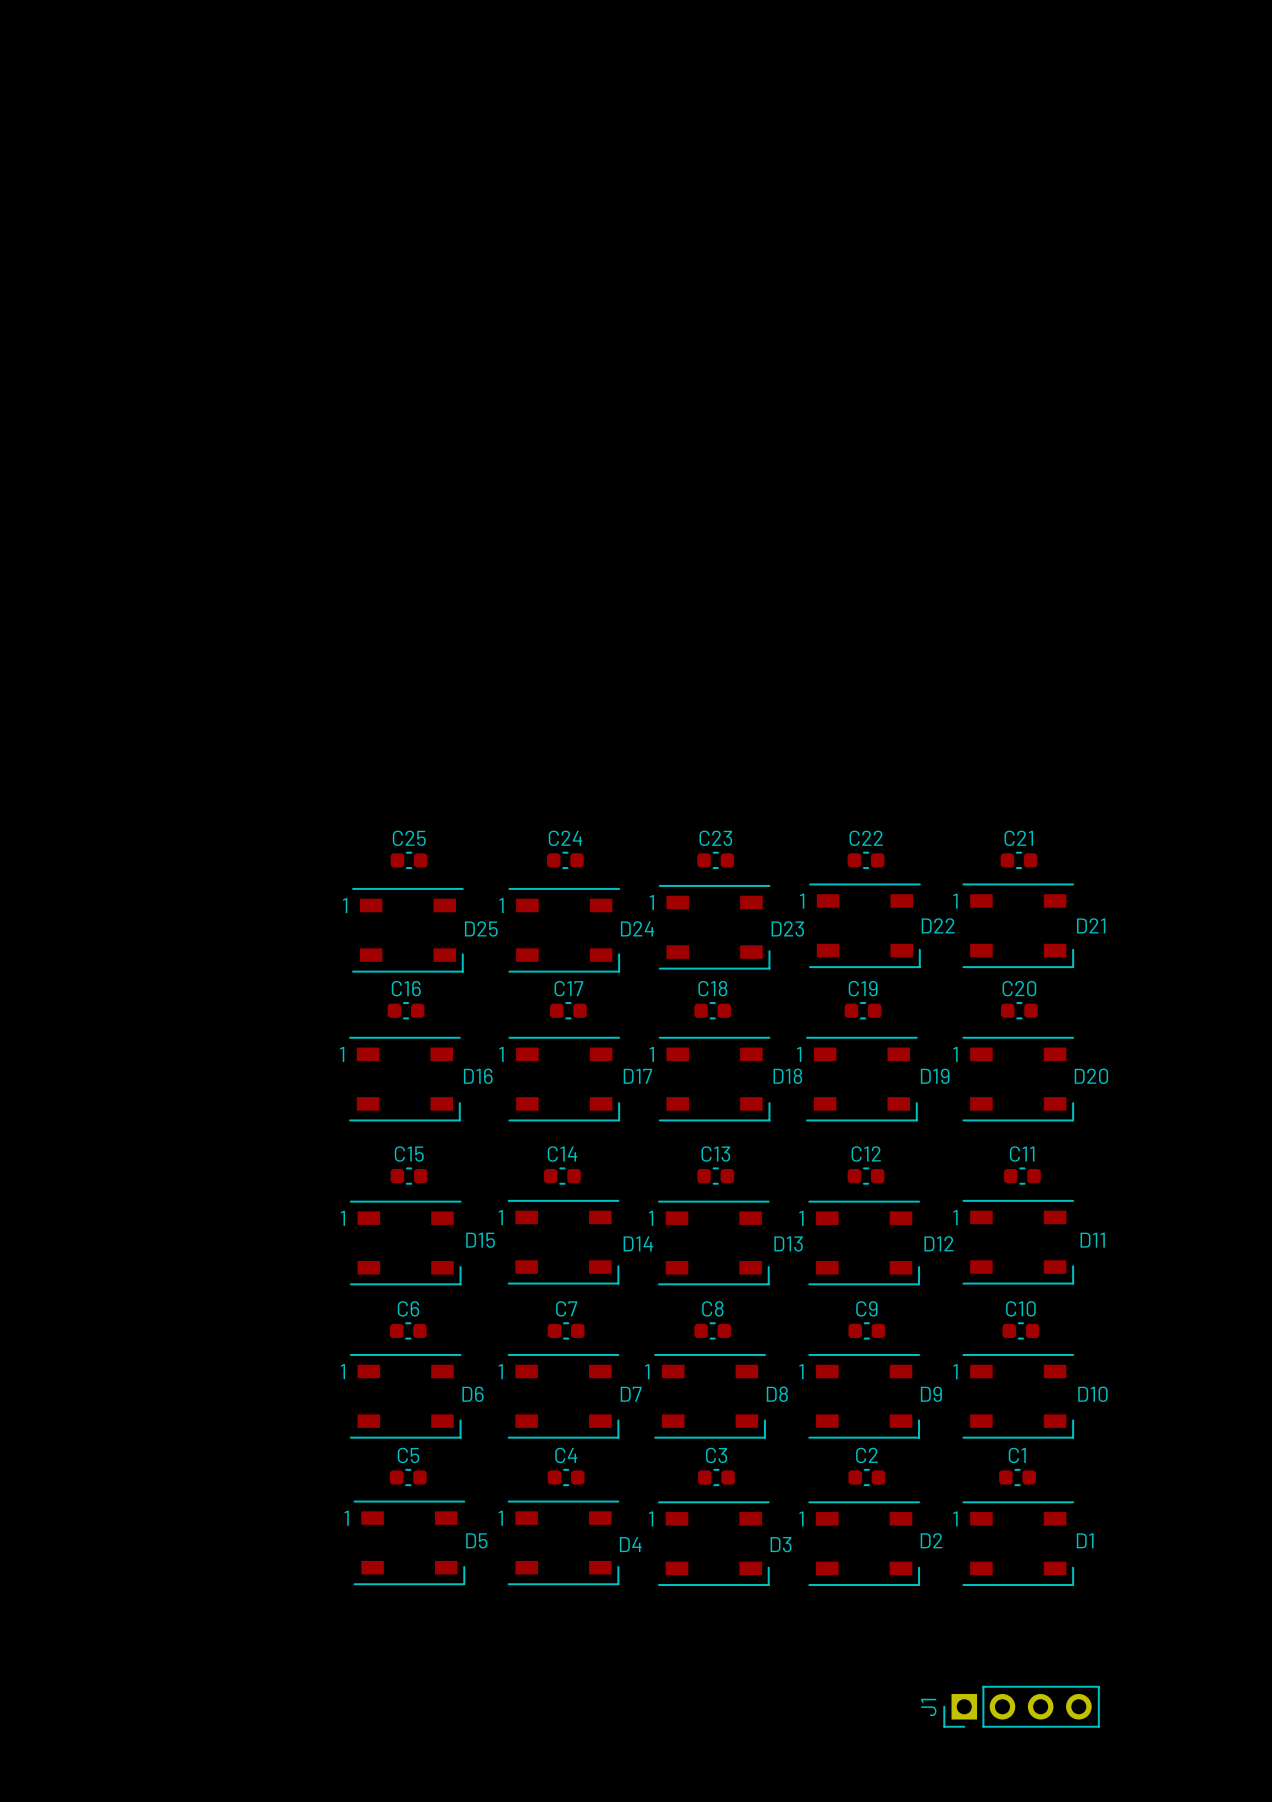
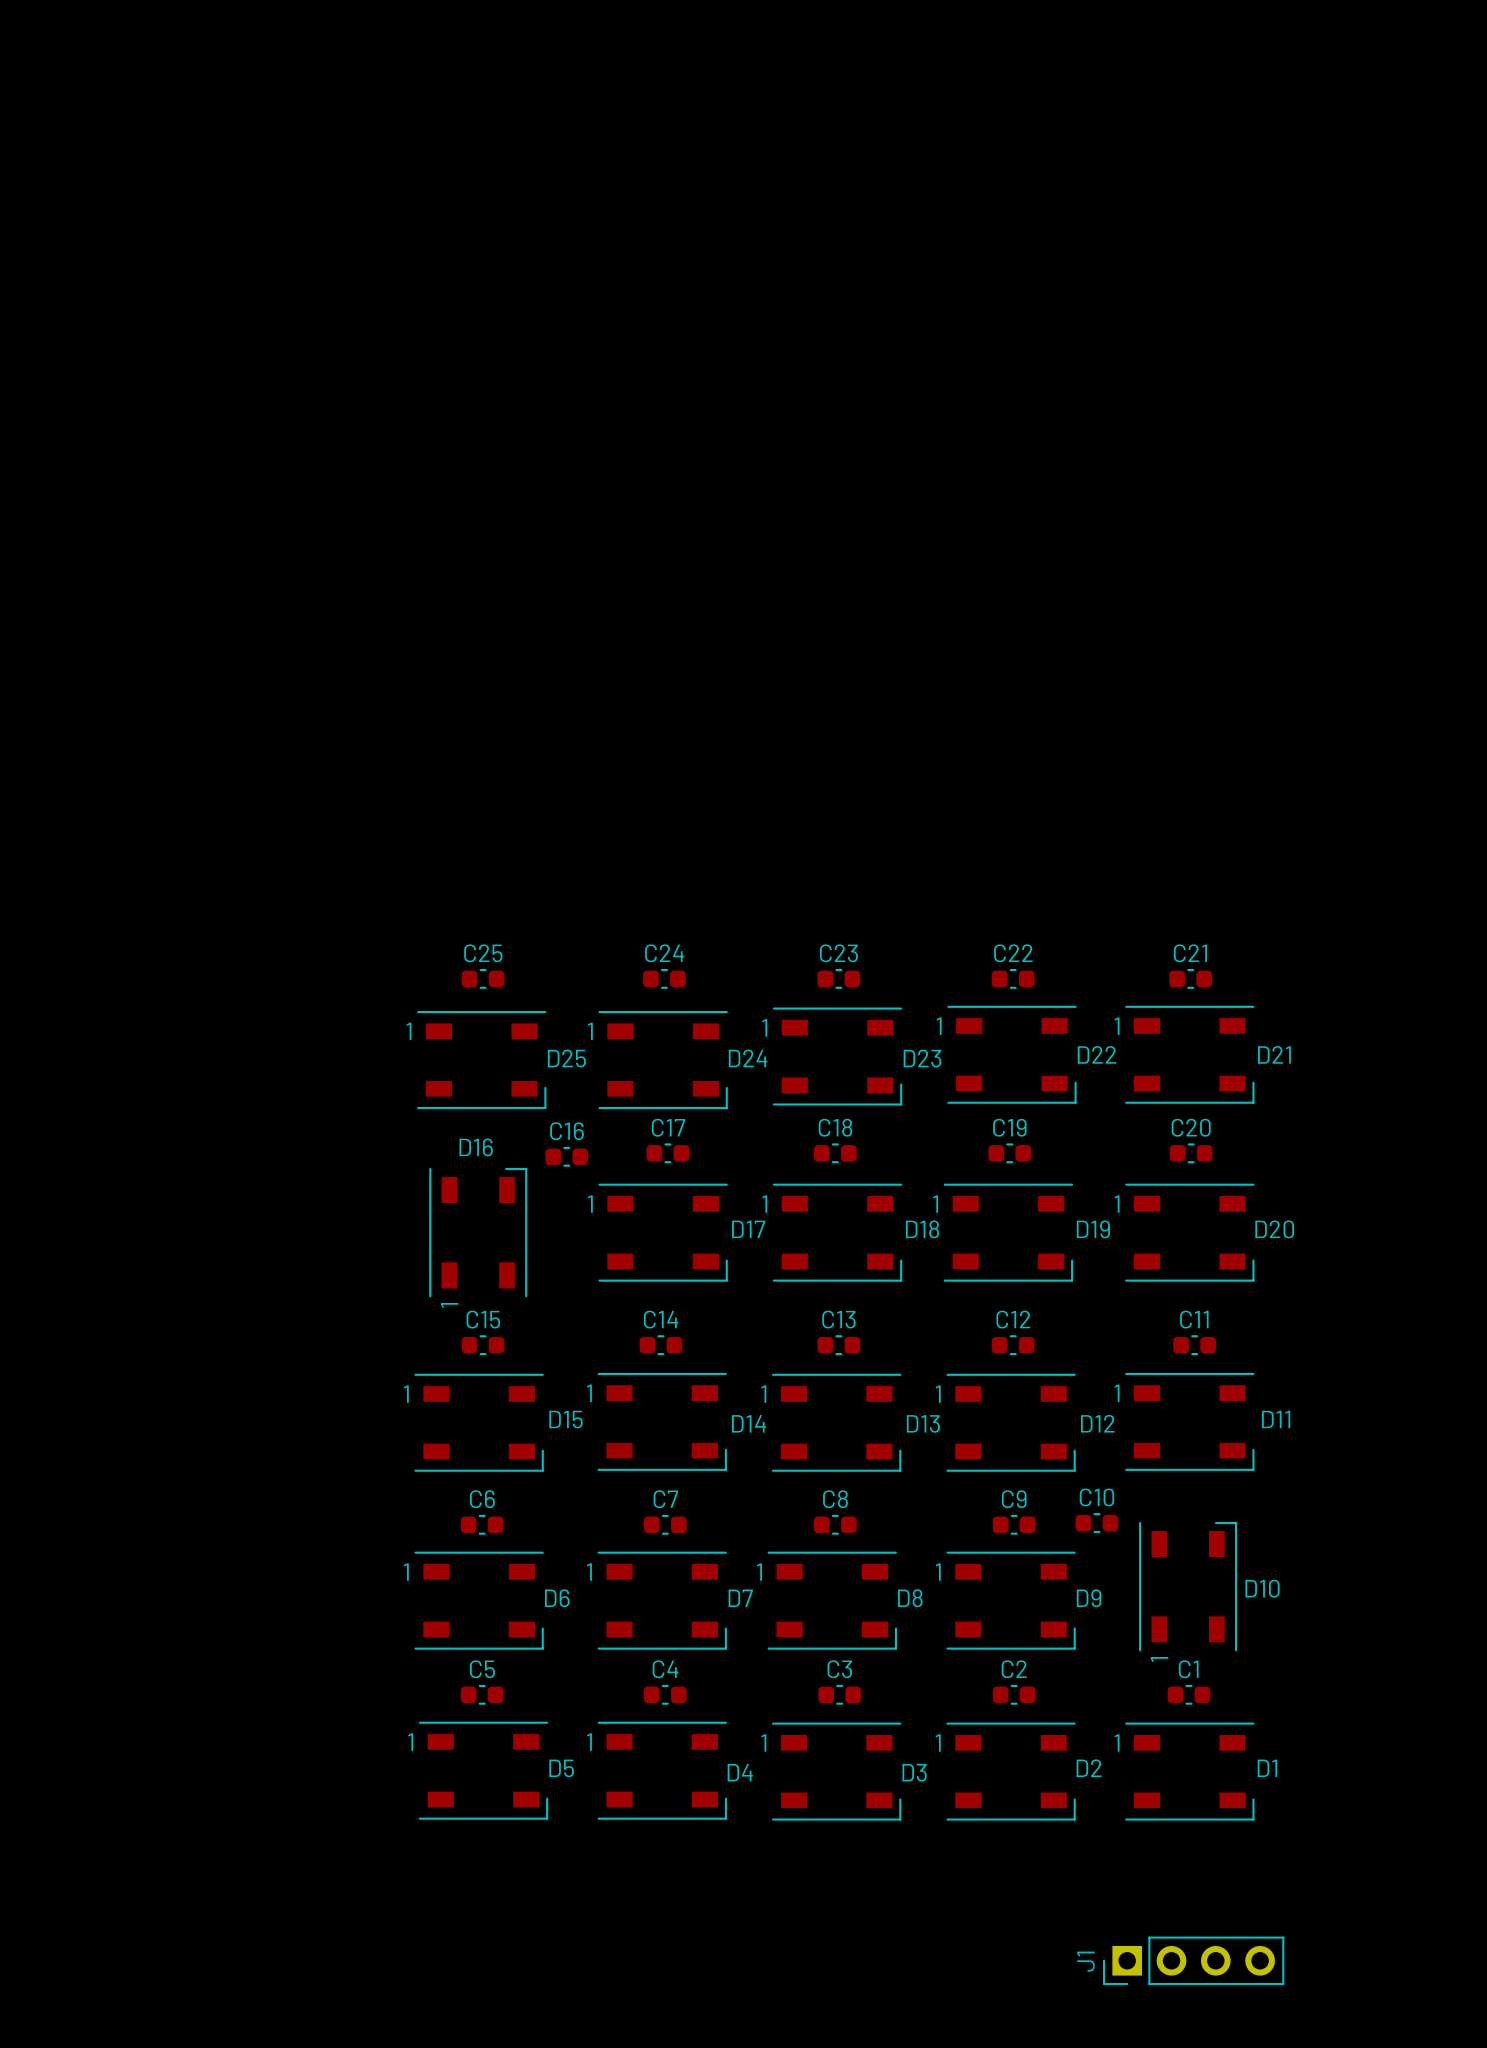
C16 position: (406, 1010) -> (566, 1156)
D16 rotation: 0° (404, 1079) -> 90° counterclockwise (478, 1232)
C10 position: (1020, 1330) -> (1096, 1523)
D10 rotation: 0° (1018, 1396) -> 90° counterclockwise (1188, 1586)

